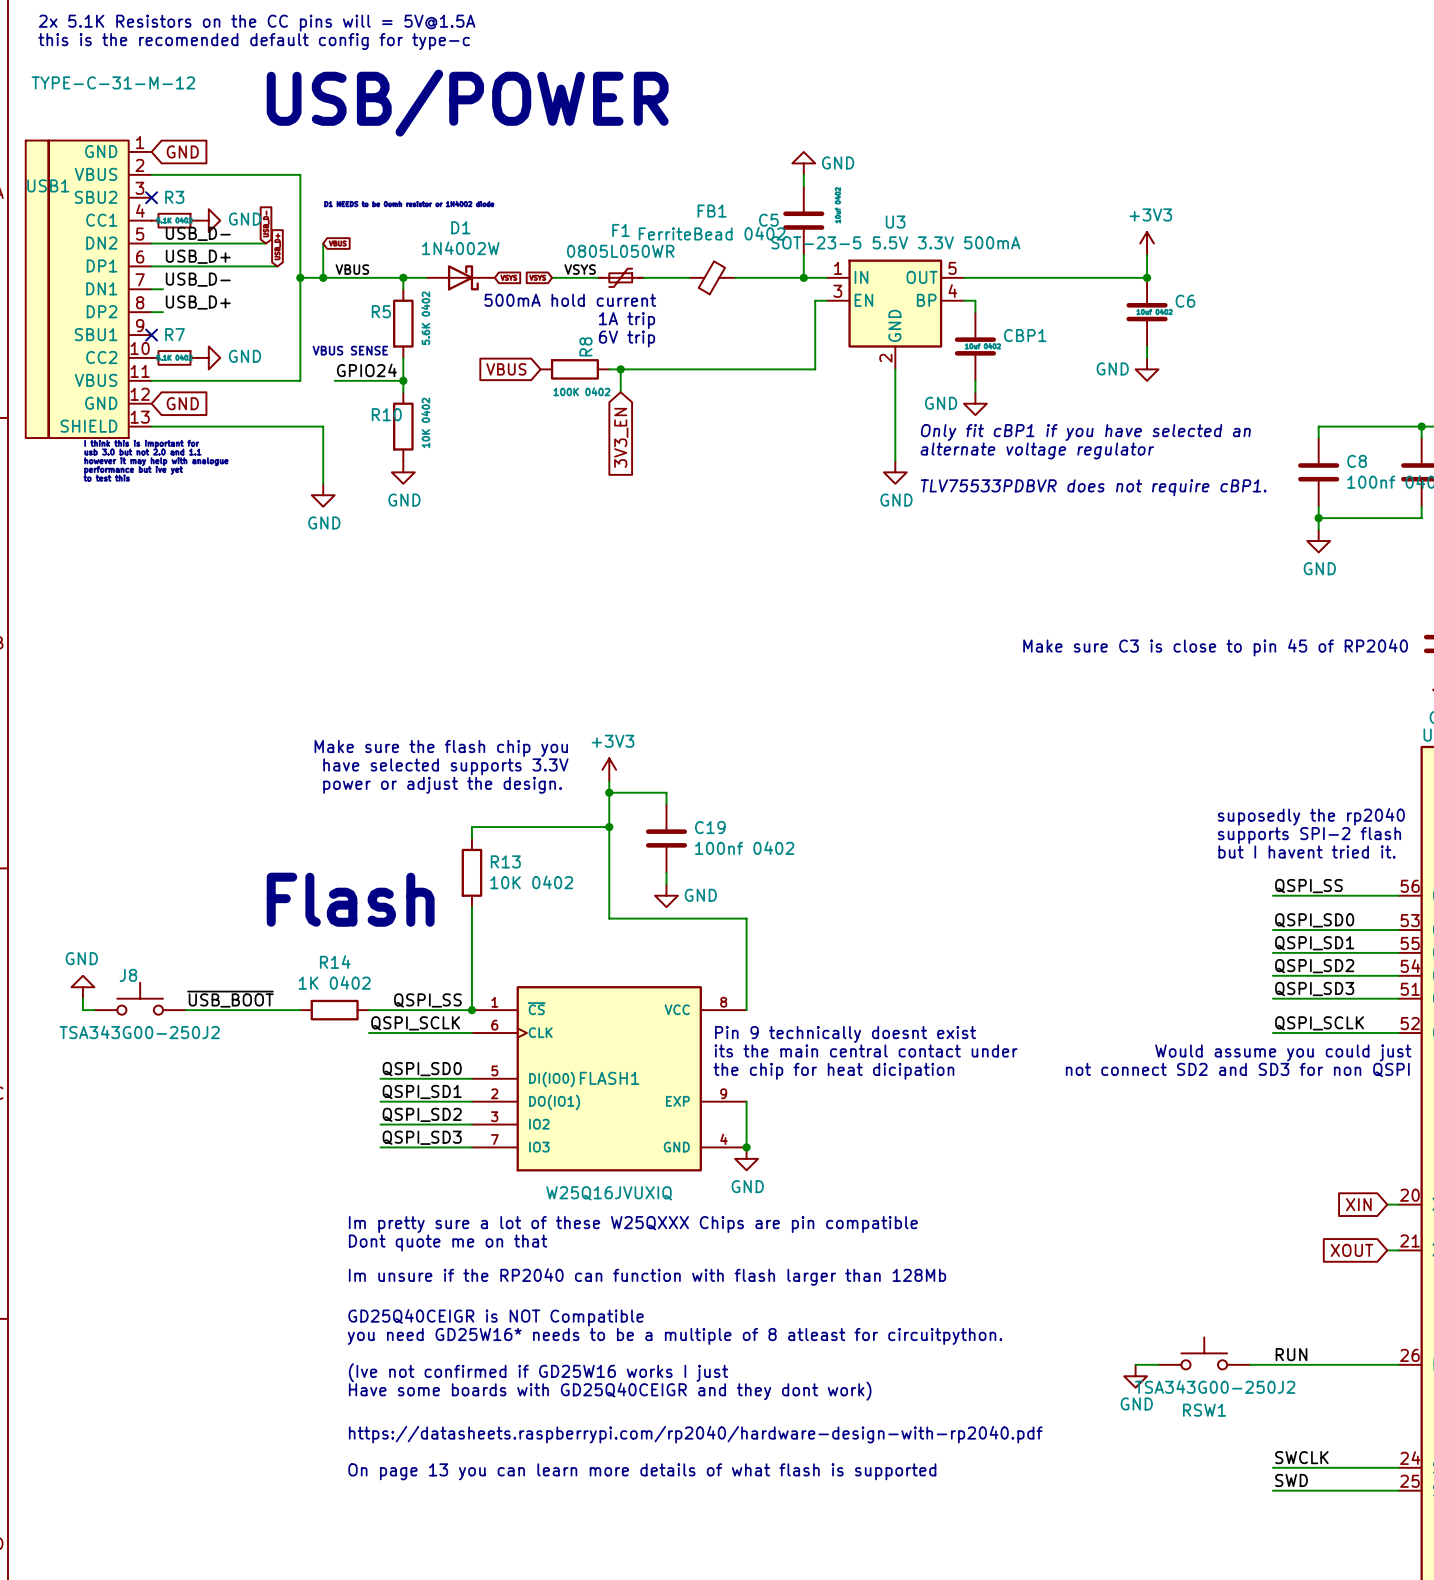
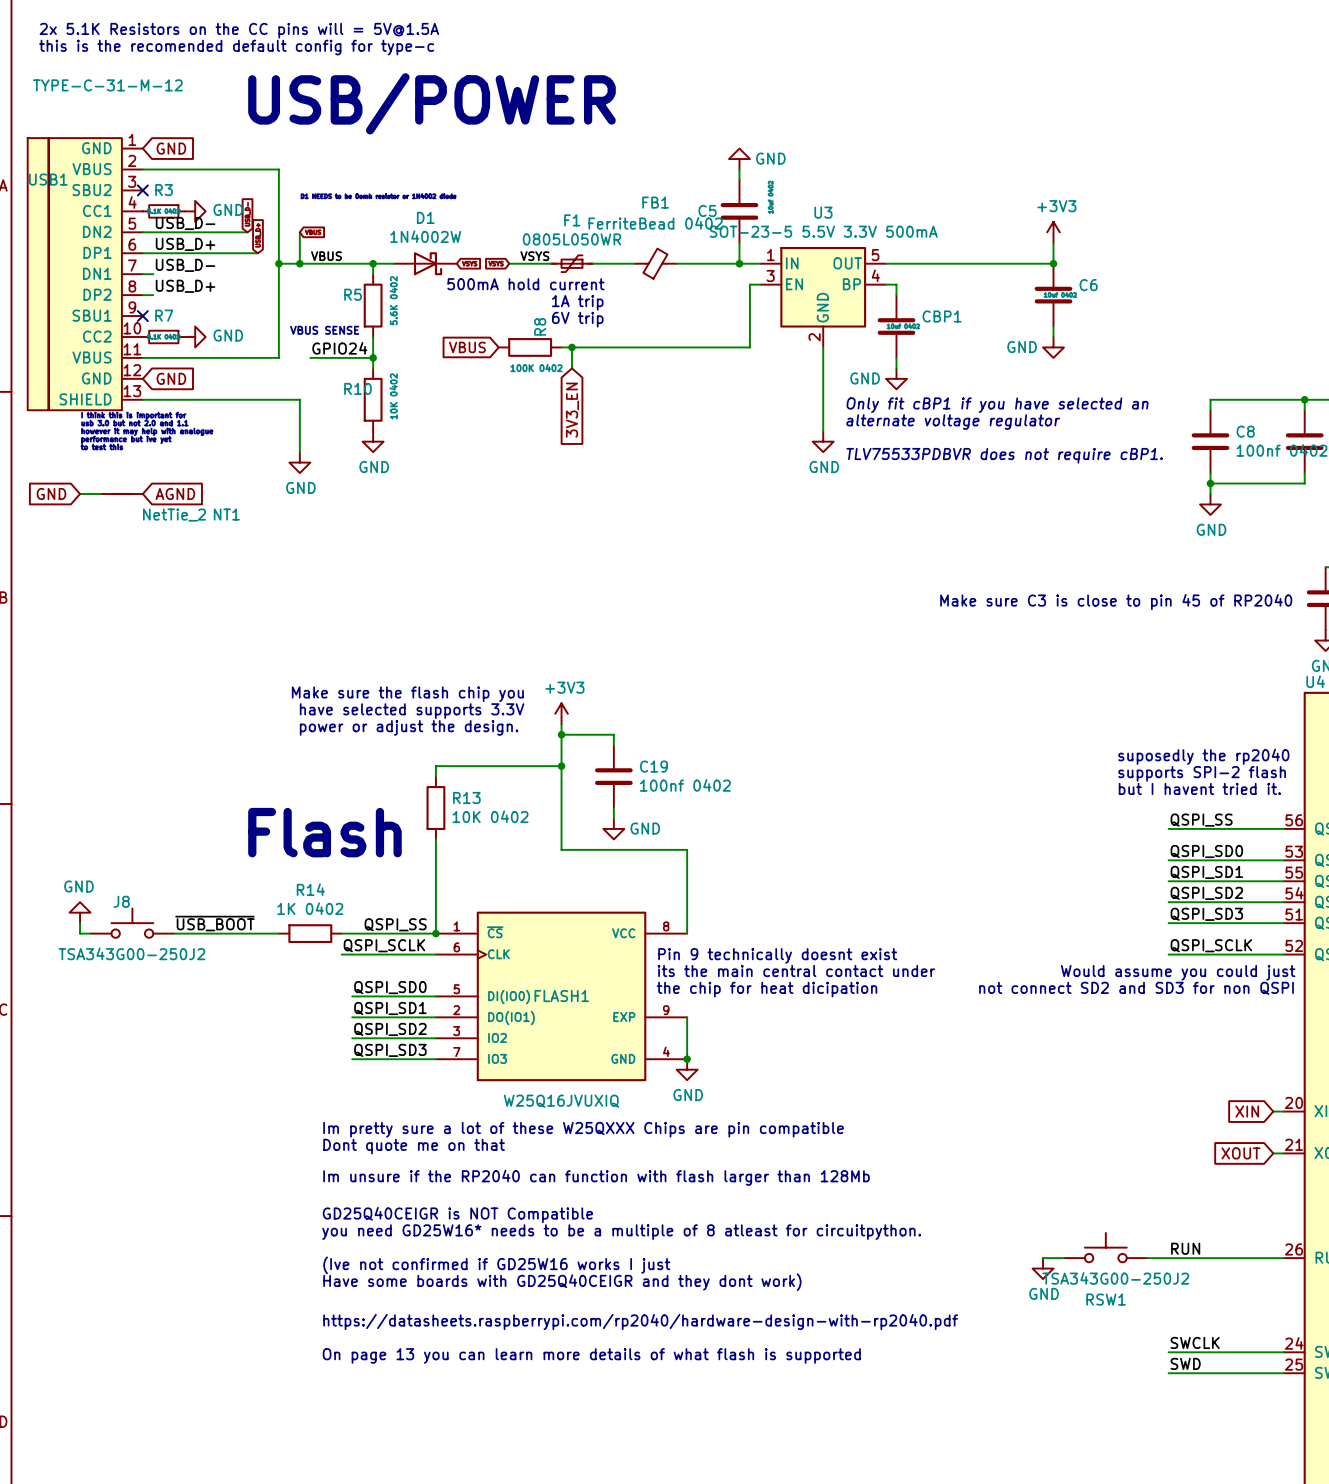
global label: none -> GND (51, 493)
wire: none -> (80, 493) (100, 493)
NT1: none -> NetTie_2 (121, 493)
global label: none -> AGND (175, 493)

